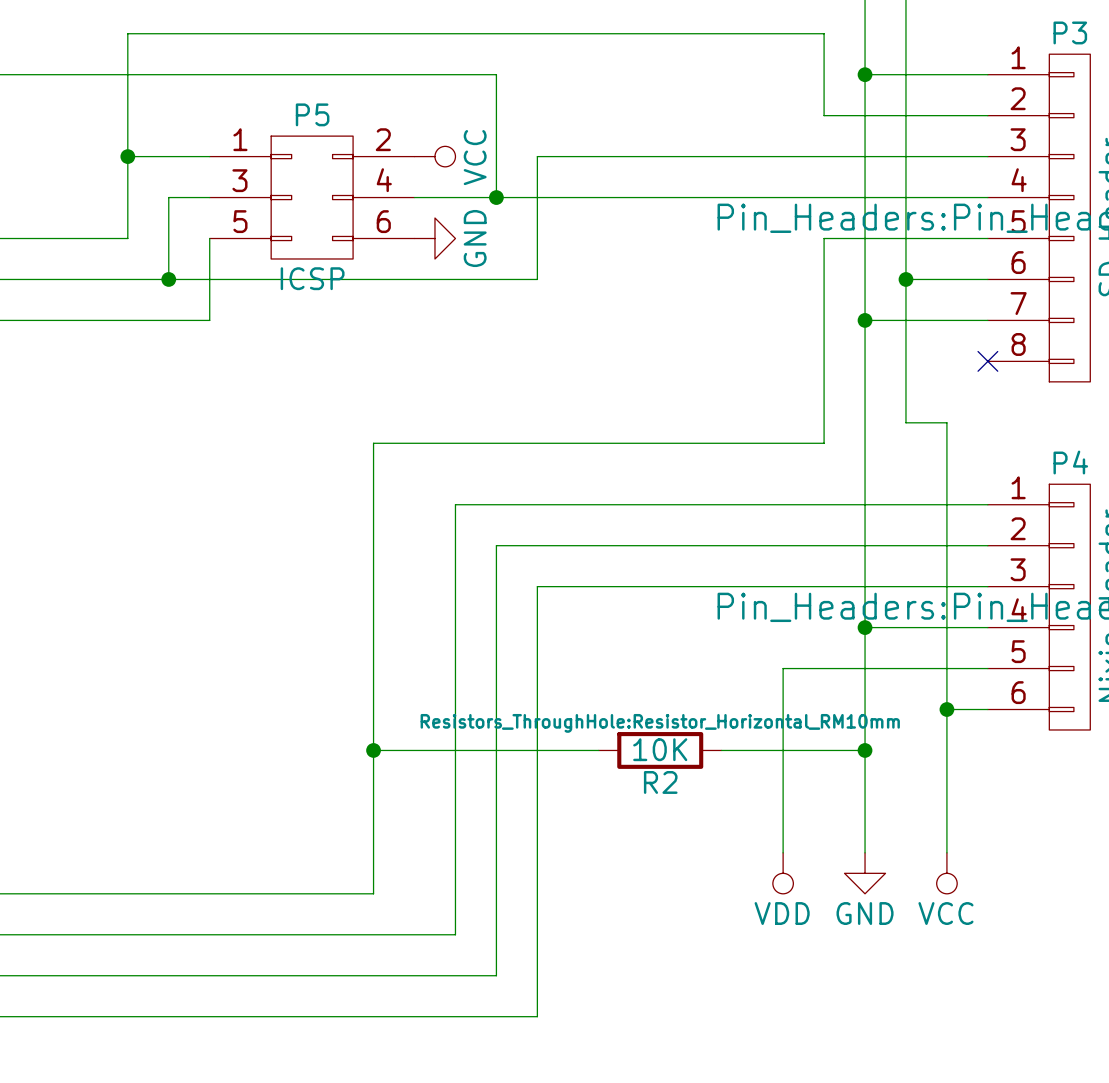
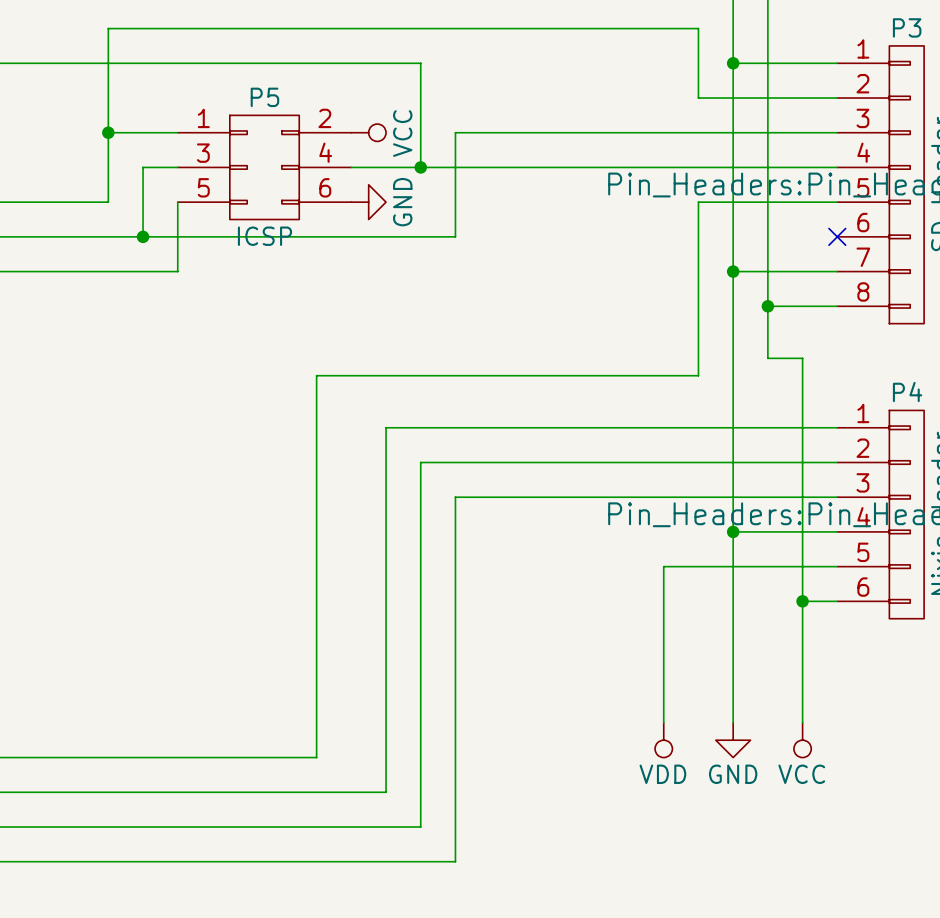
wire: (905, 279) (987, 279) -> (767, 306) (837, 306)
junction position: (905, 279) -> (767, 306)
no-connect mark position: (987, 361) -> (837, 236)
wire: (373, 750) (598, 750) -> none
junction: (373, 750) -> none
R2: 10K (660, 750) -> none
wire: (721, 750) (865, 750) -> none
junction: (865, 750) -> none

